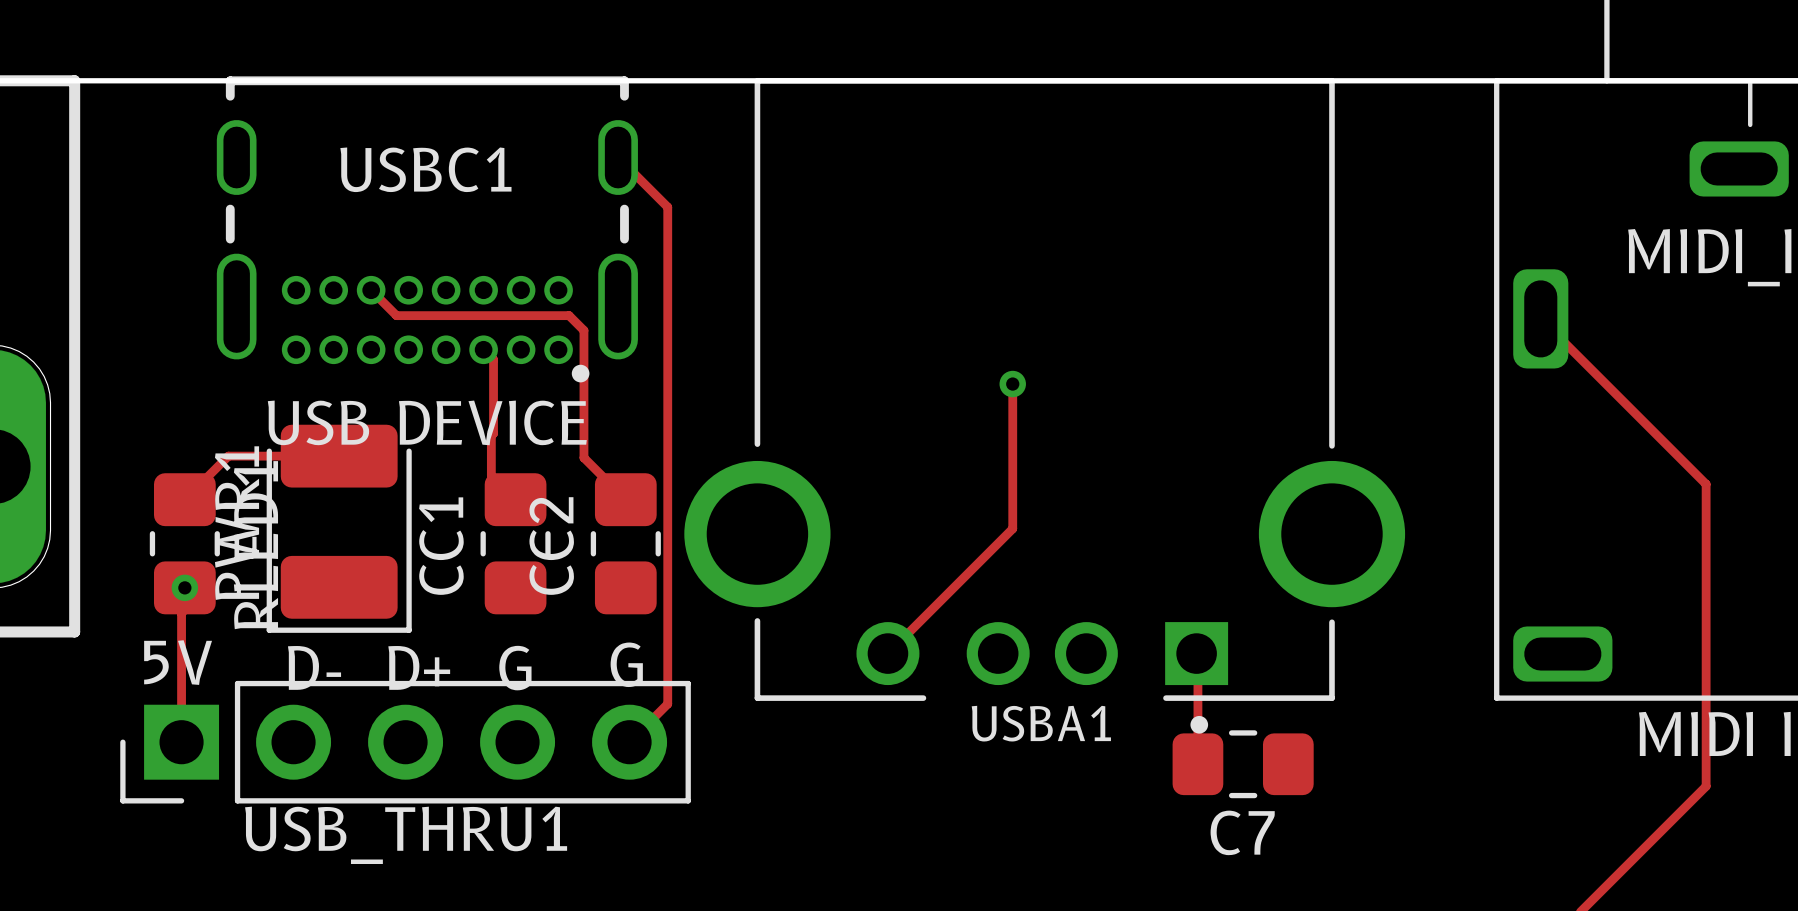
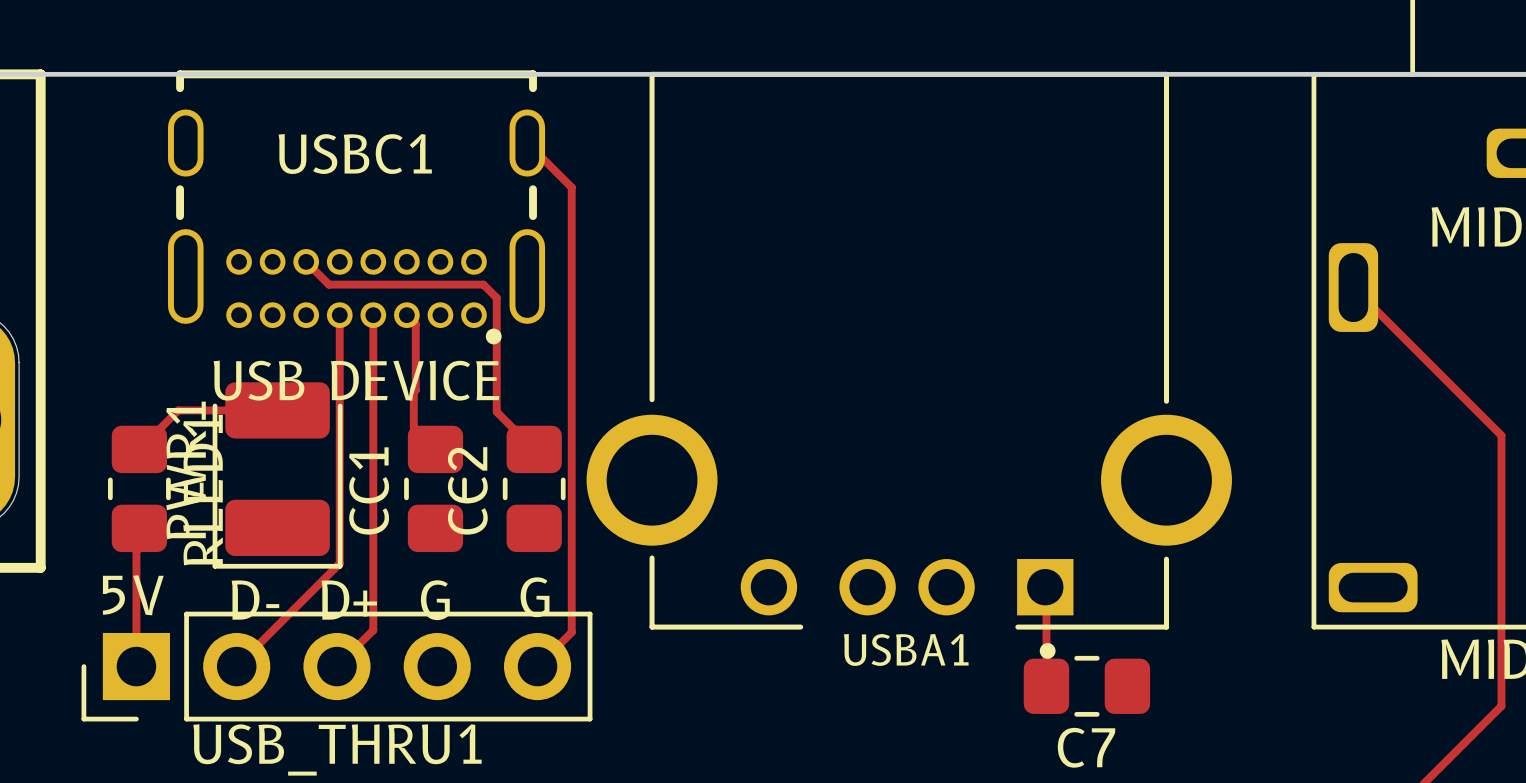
track: none -> (339, 315) (339, 563) (236, 666)
track: none -> (373, 315) (373, 630) (336, 666)
track: (1012, 384) (1012, 528) (887, 653) -> none
via: (1012, 384) -> none
via: (184, 587) -> none

